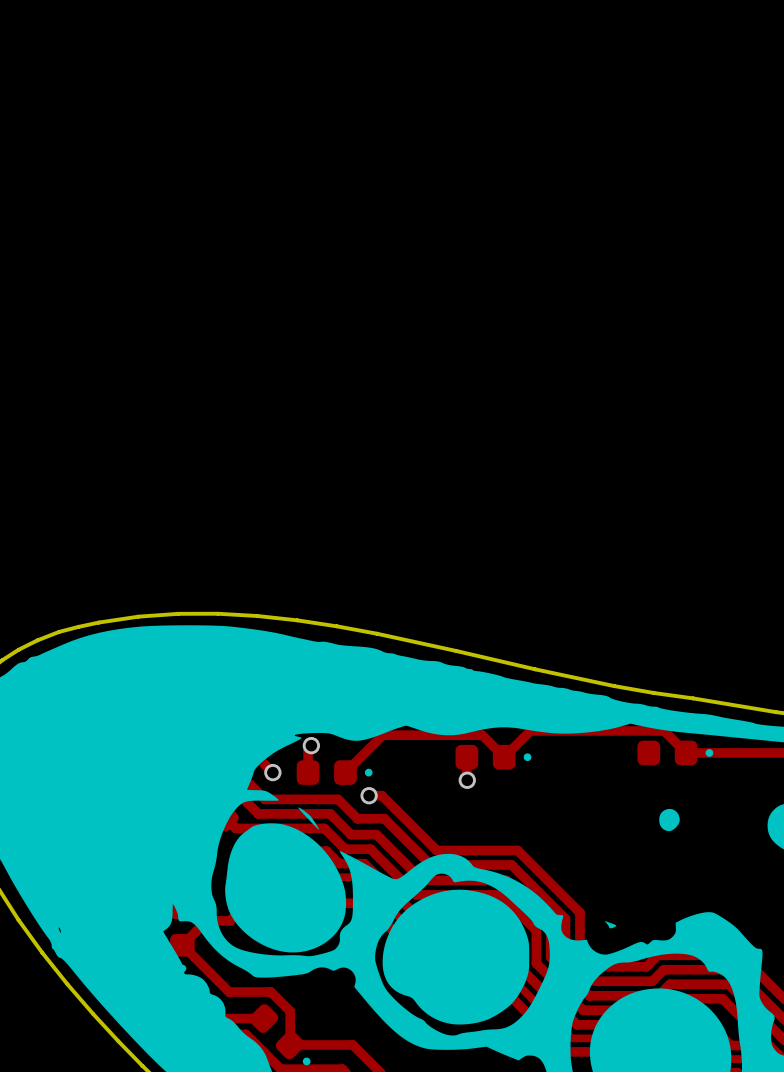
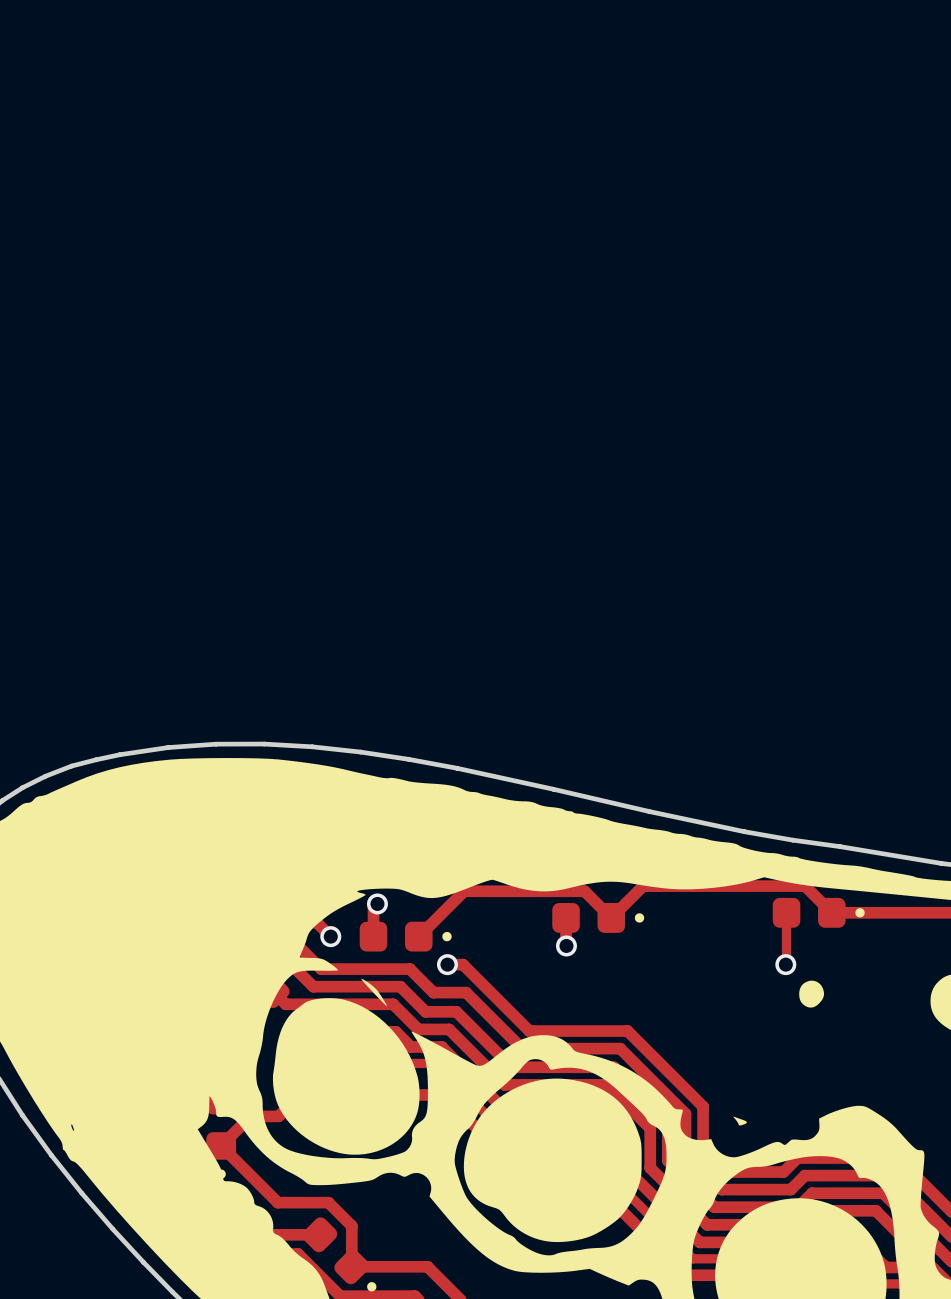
track: none -> (786, 912) (785, 964)
via: none -> (785, 964)

